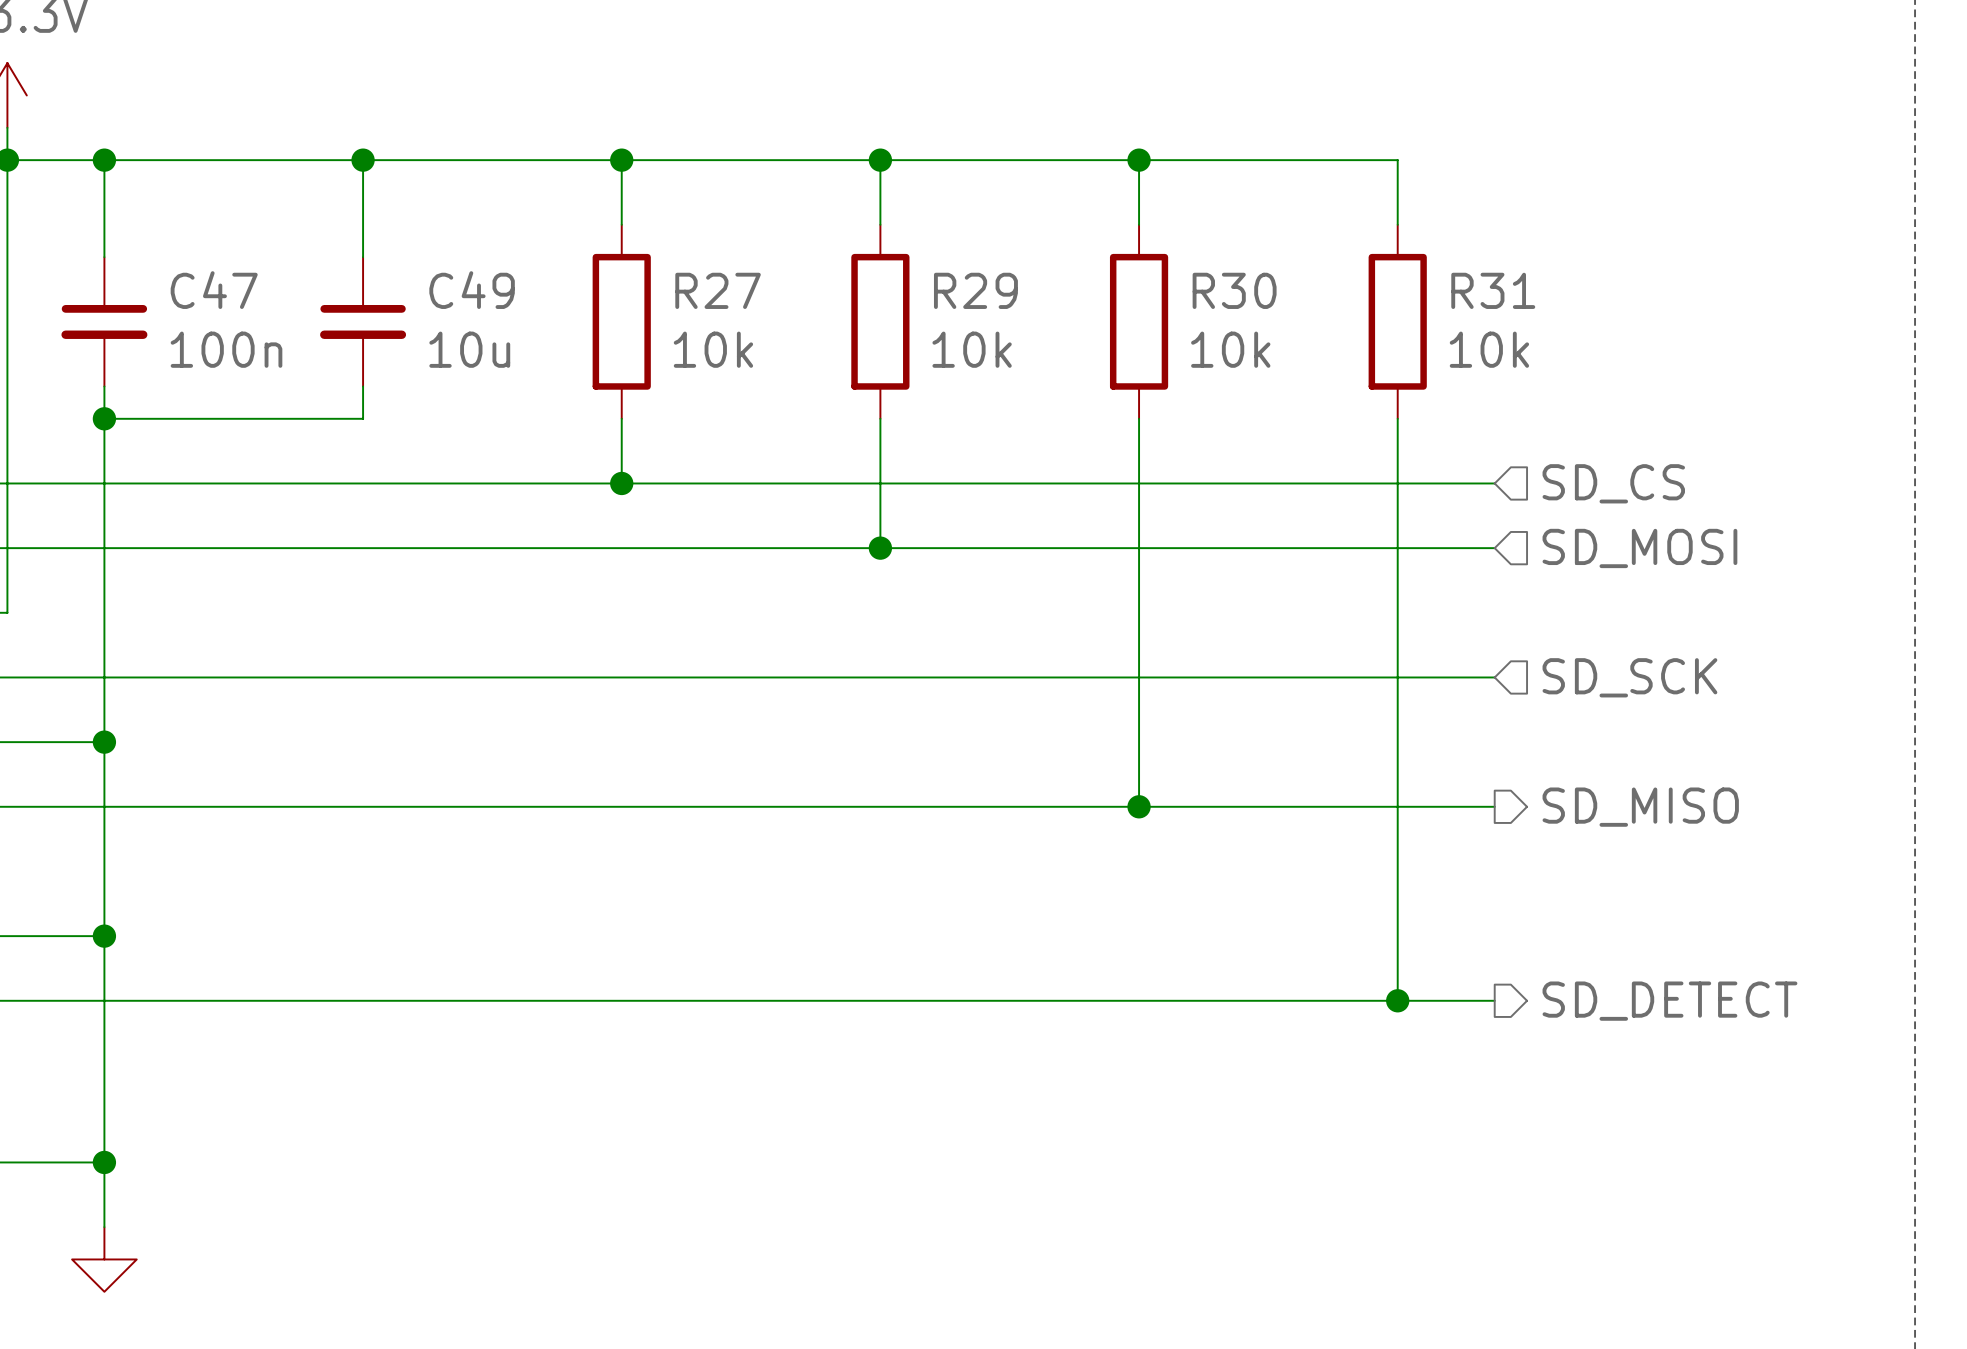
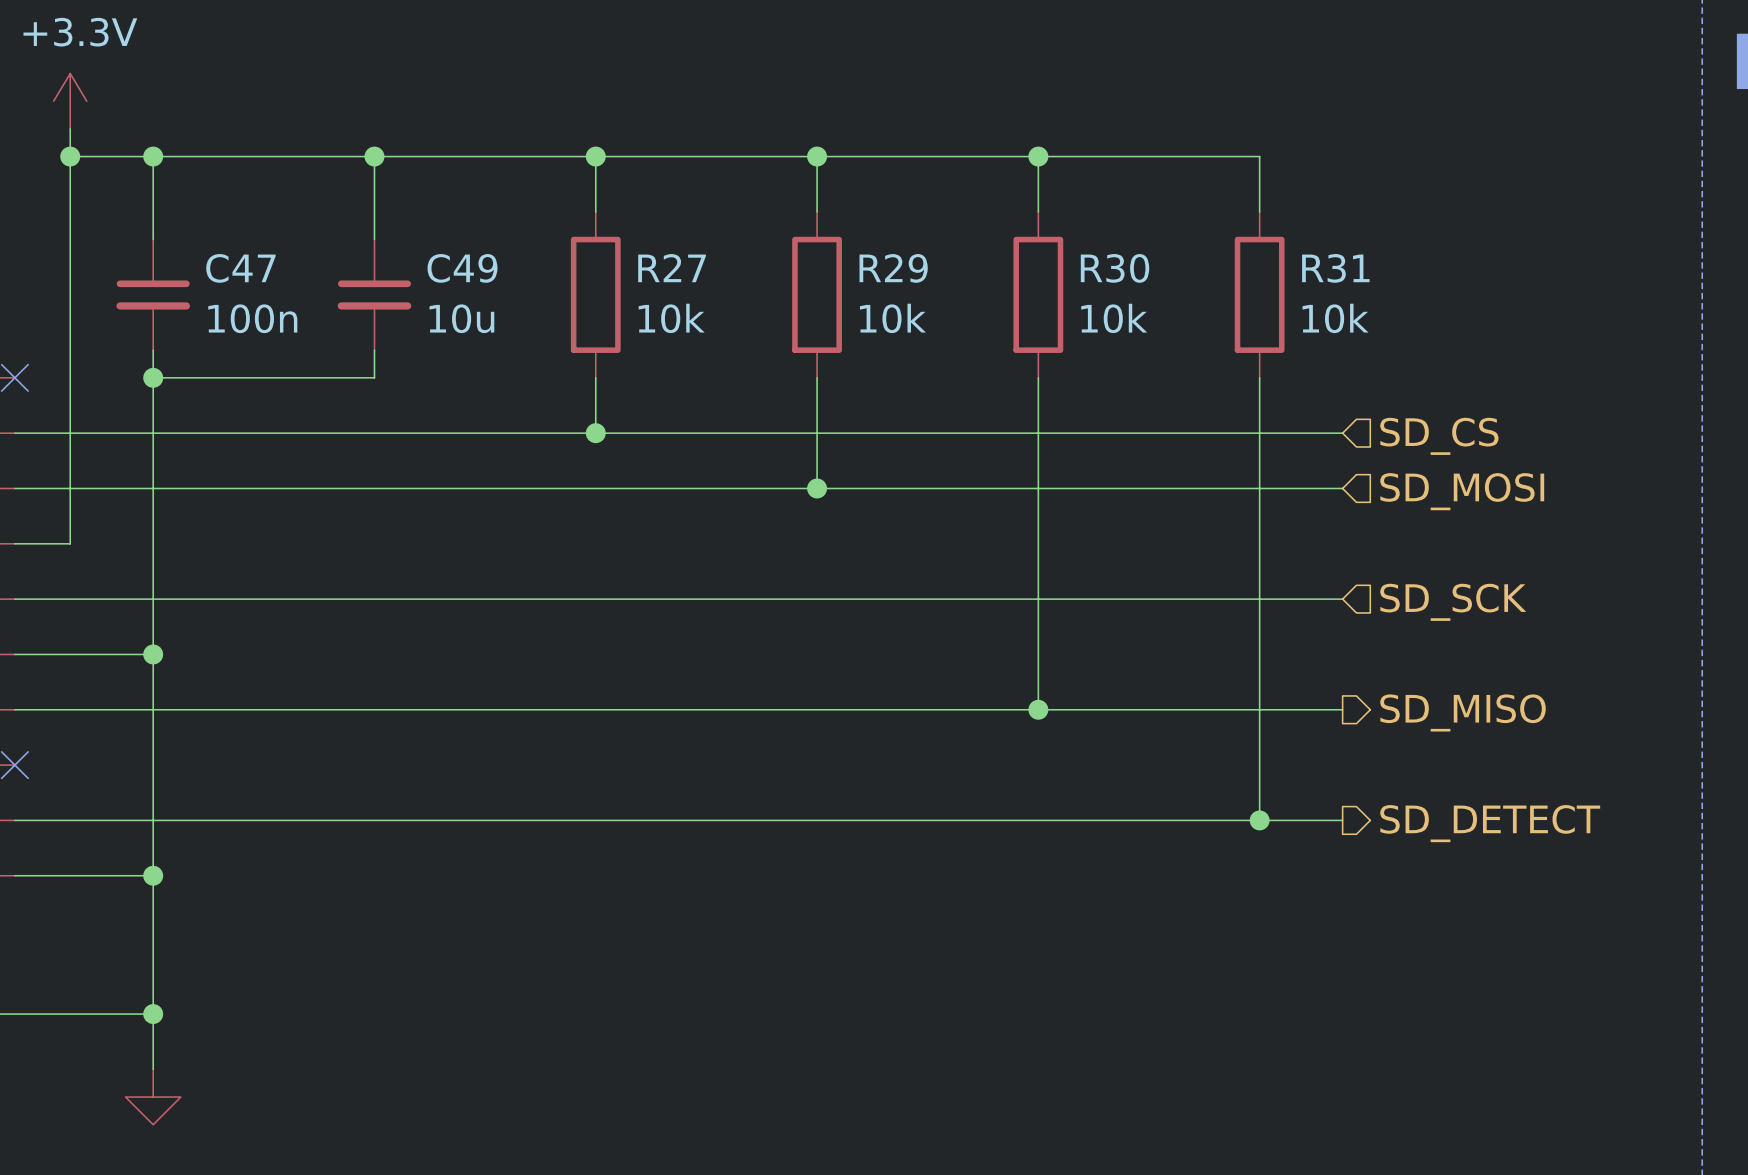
junction position: (104, 936) -> (153, 875)
wire: (1397, 936) (1397, 1000) -> none
wire: (104, 1000) (1494, 1000) -> (153, 820) (1342, 820)
junction position: (1397, 1000) -> (1259, 820)
hierarchical label position: SD_DETECT (1669, 1001) -> SD_DETECT (1490, 823)

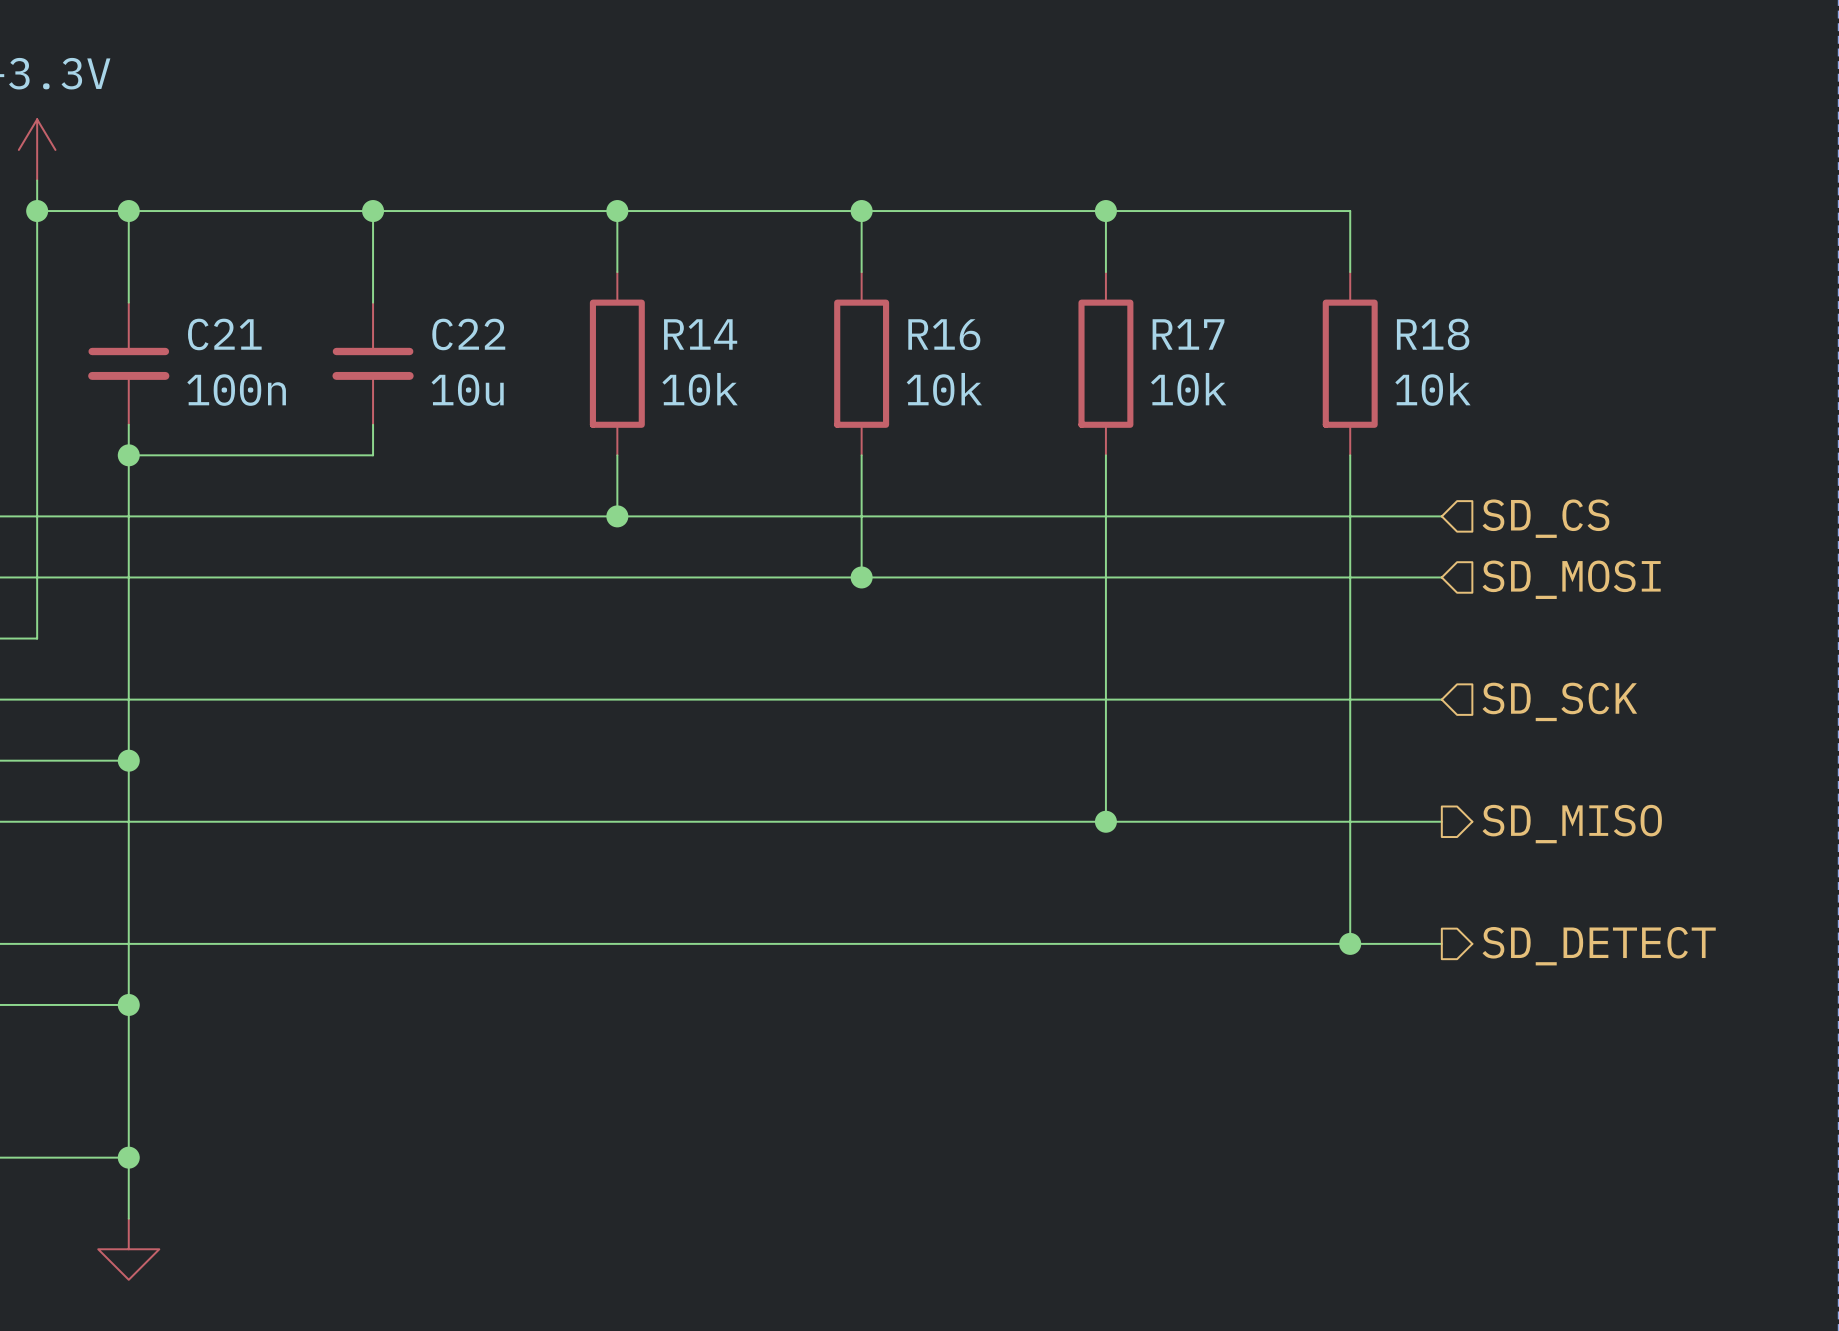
C47 name: C47 (240, 268) -> C21 (224, 334)
C49 name: C49 (462, 268) -> C22 (468, 334)
R27 name: R27 (672, 268) -> R14 (700, 334)
R29 name: R29 (893, 268) -> R16 (944, 334)
R30 name: R30 (1115, 268) -> R17 (1188, 334)
R31 name: R31 (1335, 268) -> R18 (1433, 334)

